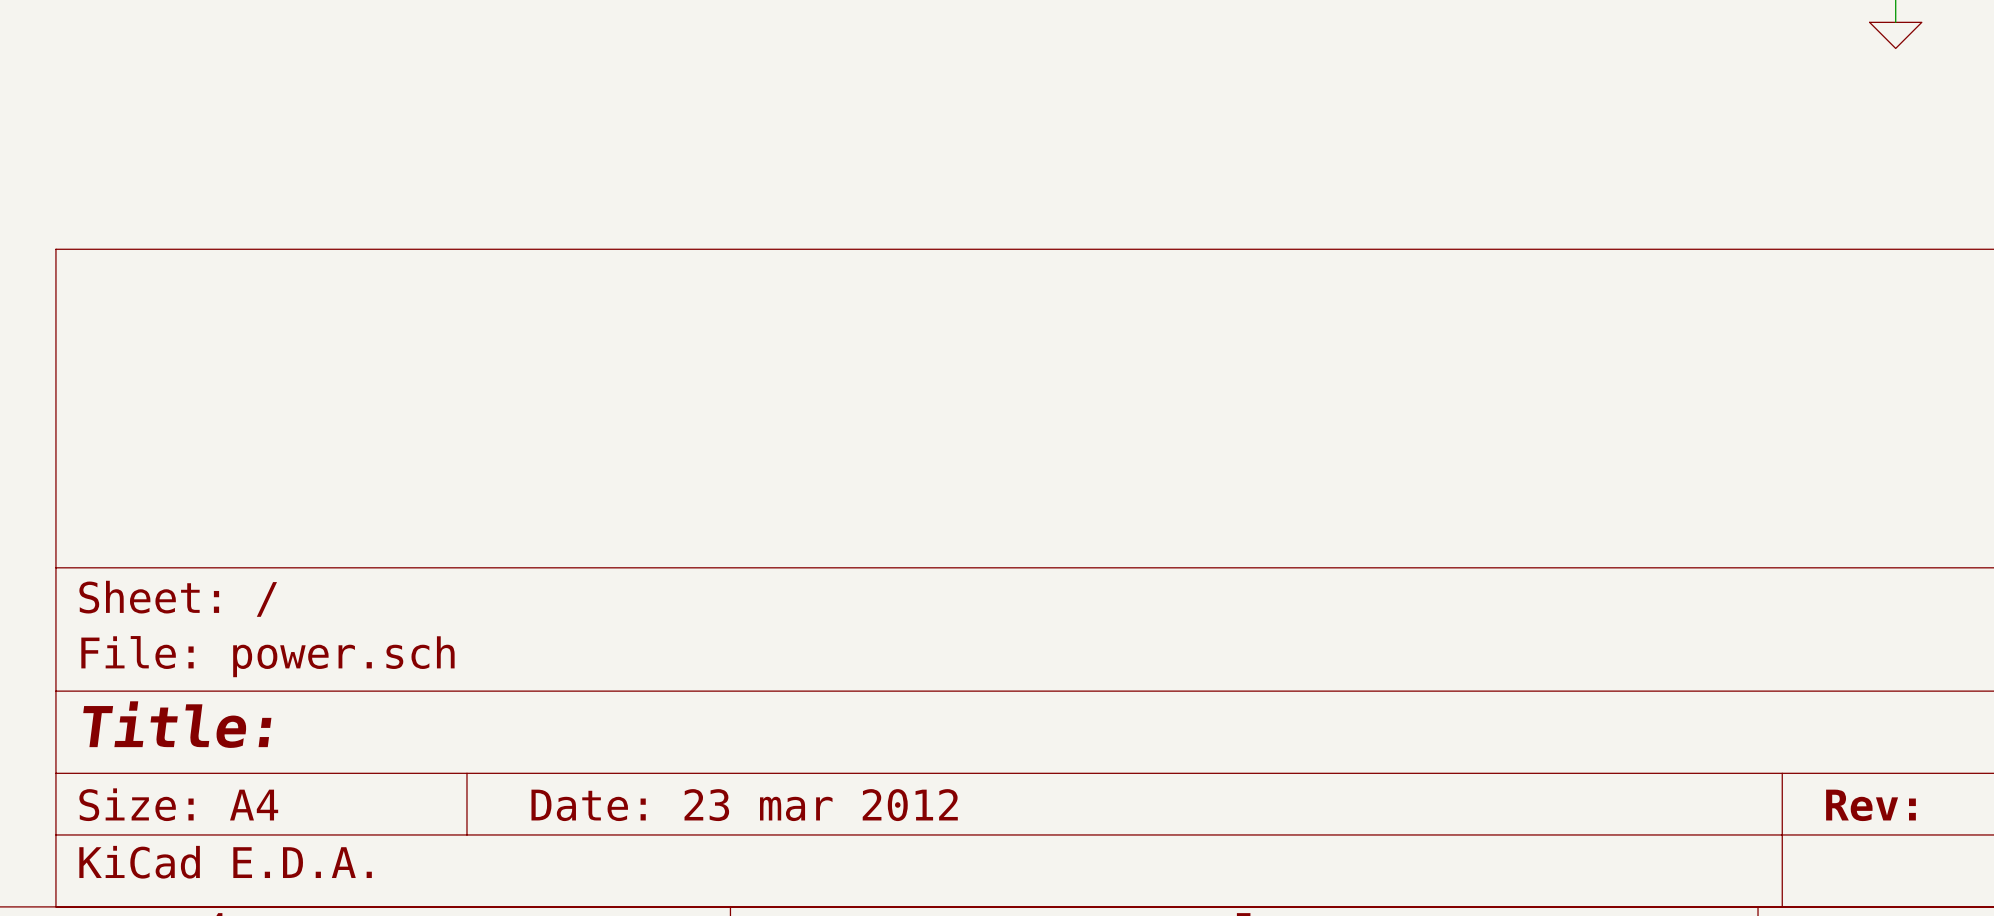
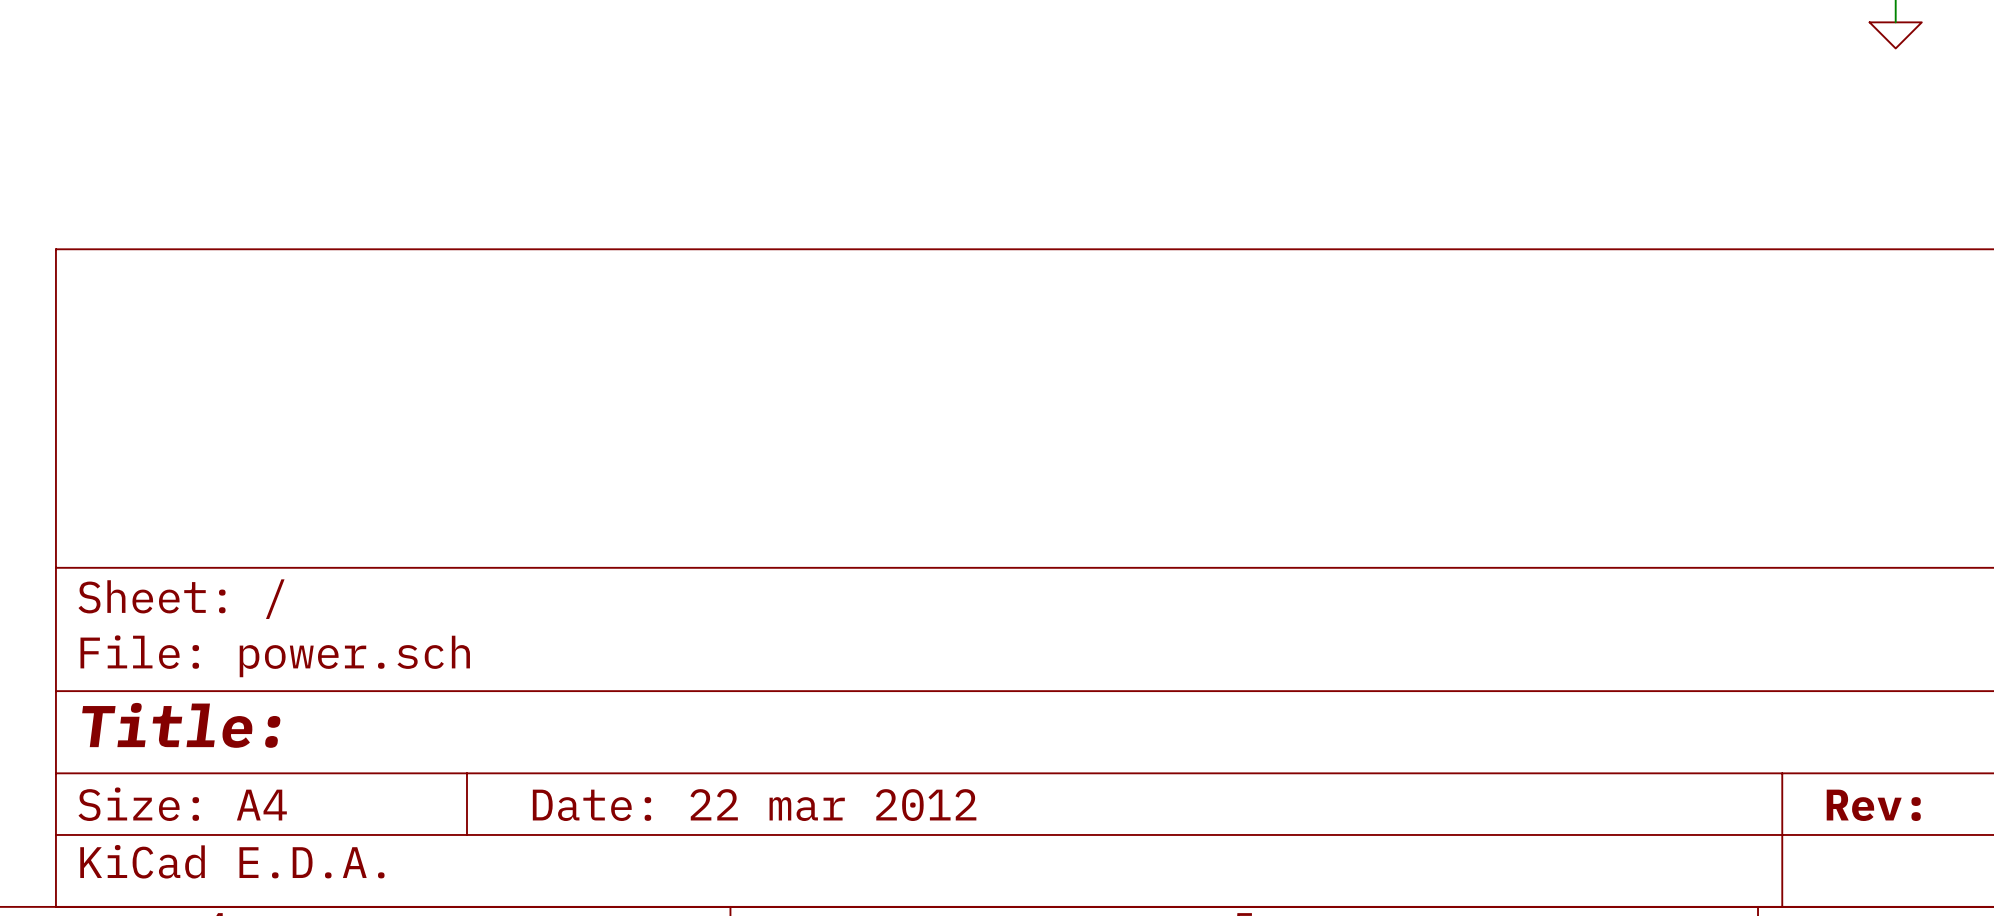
title block: Date: 23 mar 2012 (744, 805) -> Date: 22 mar 2012 (754, 805)

